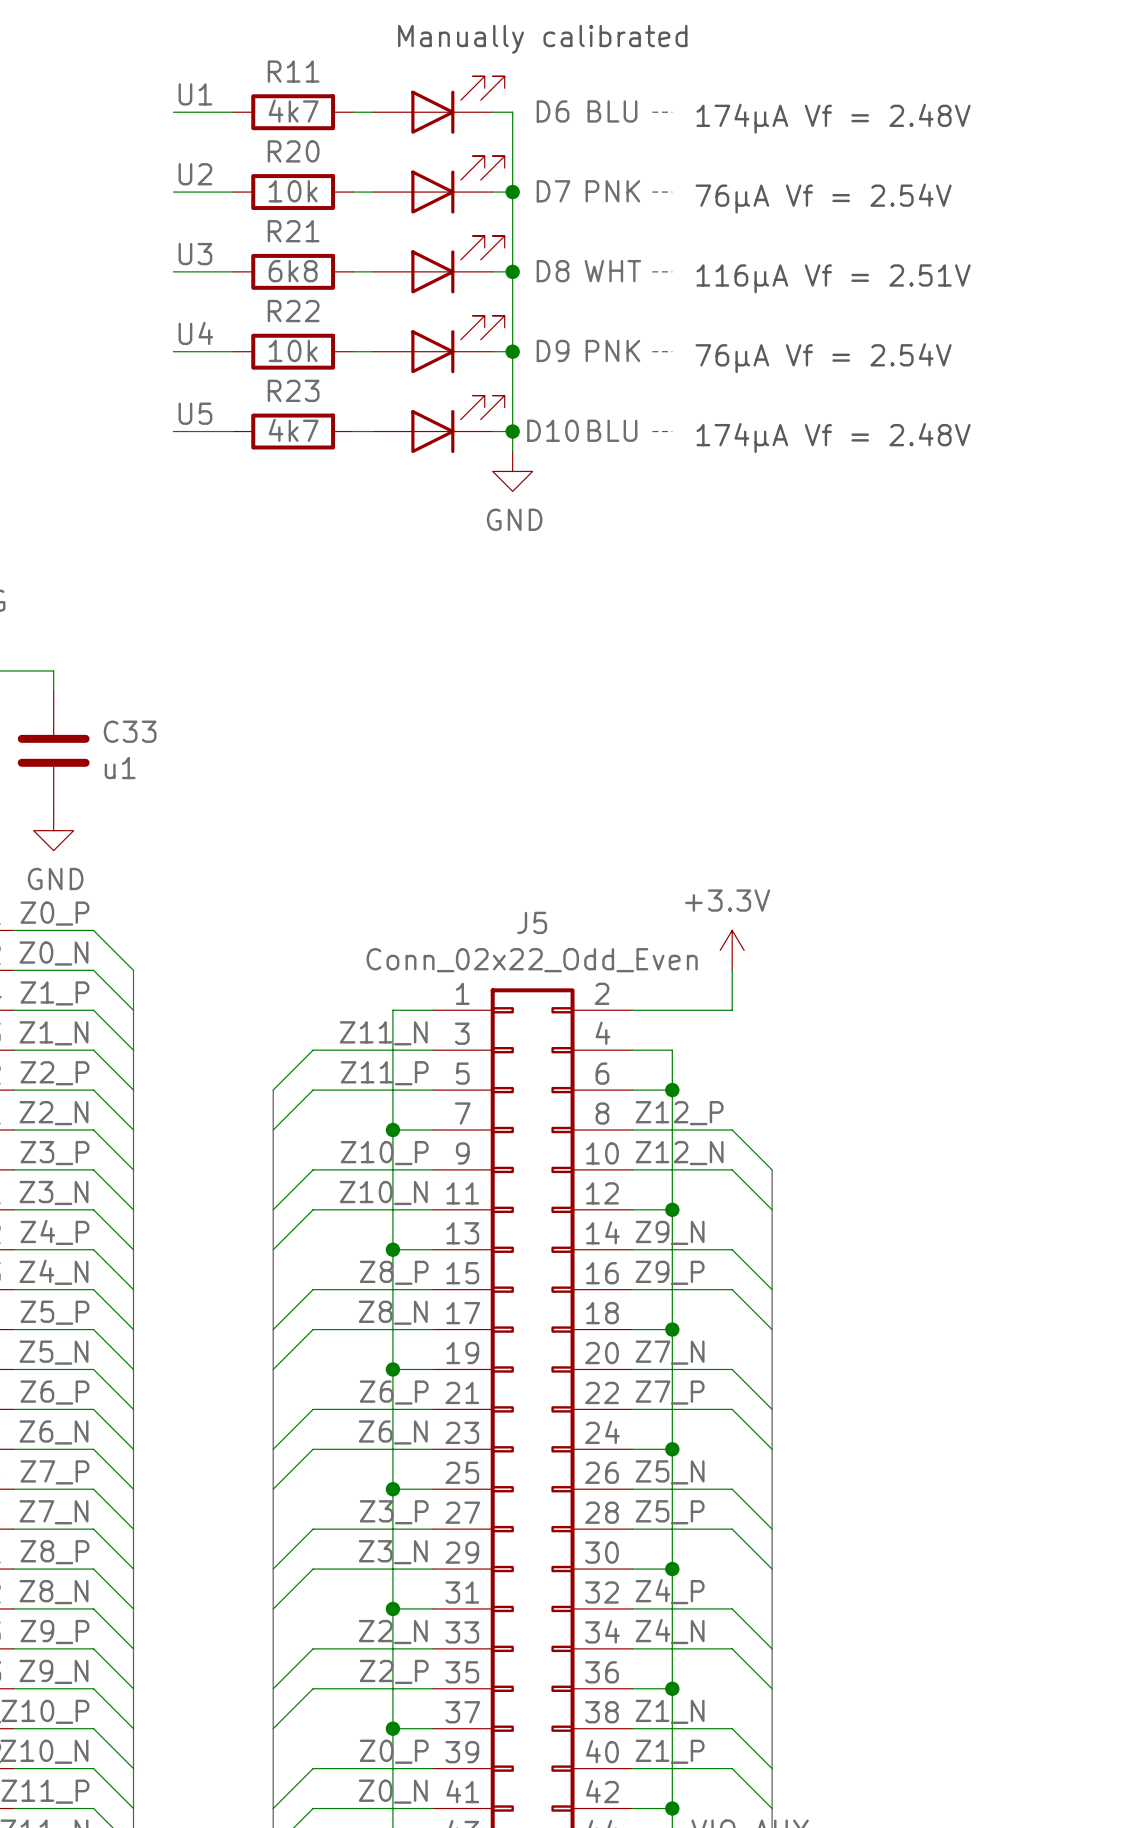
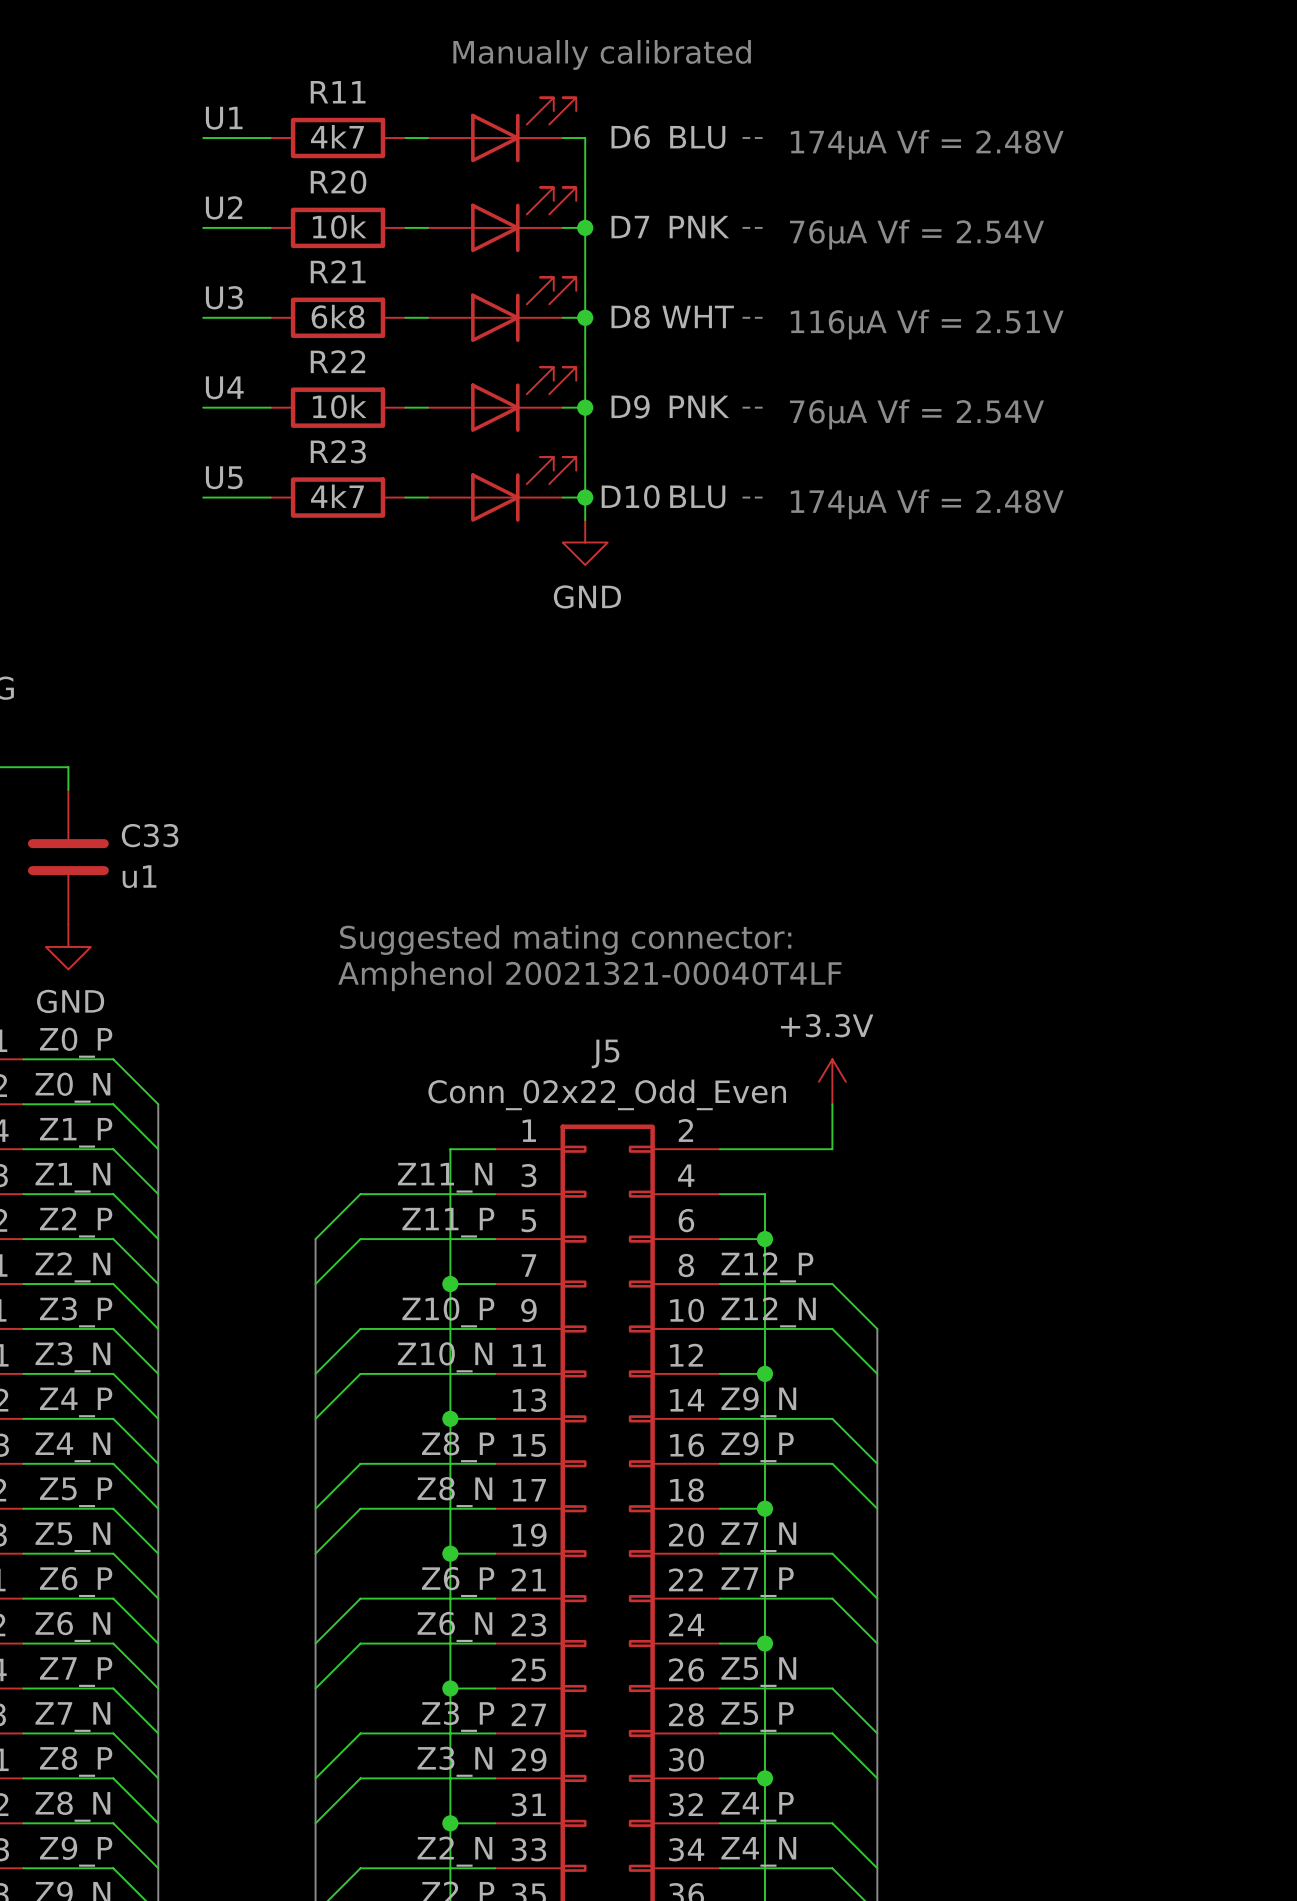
text: none -> Suggested mating connector: (565, 940)
text: none -> Amphenol 20021321-00040T4LF (589, 976)

